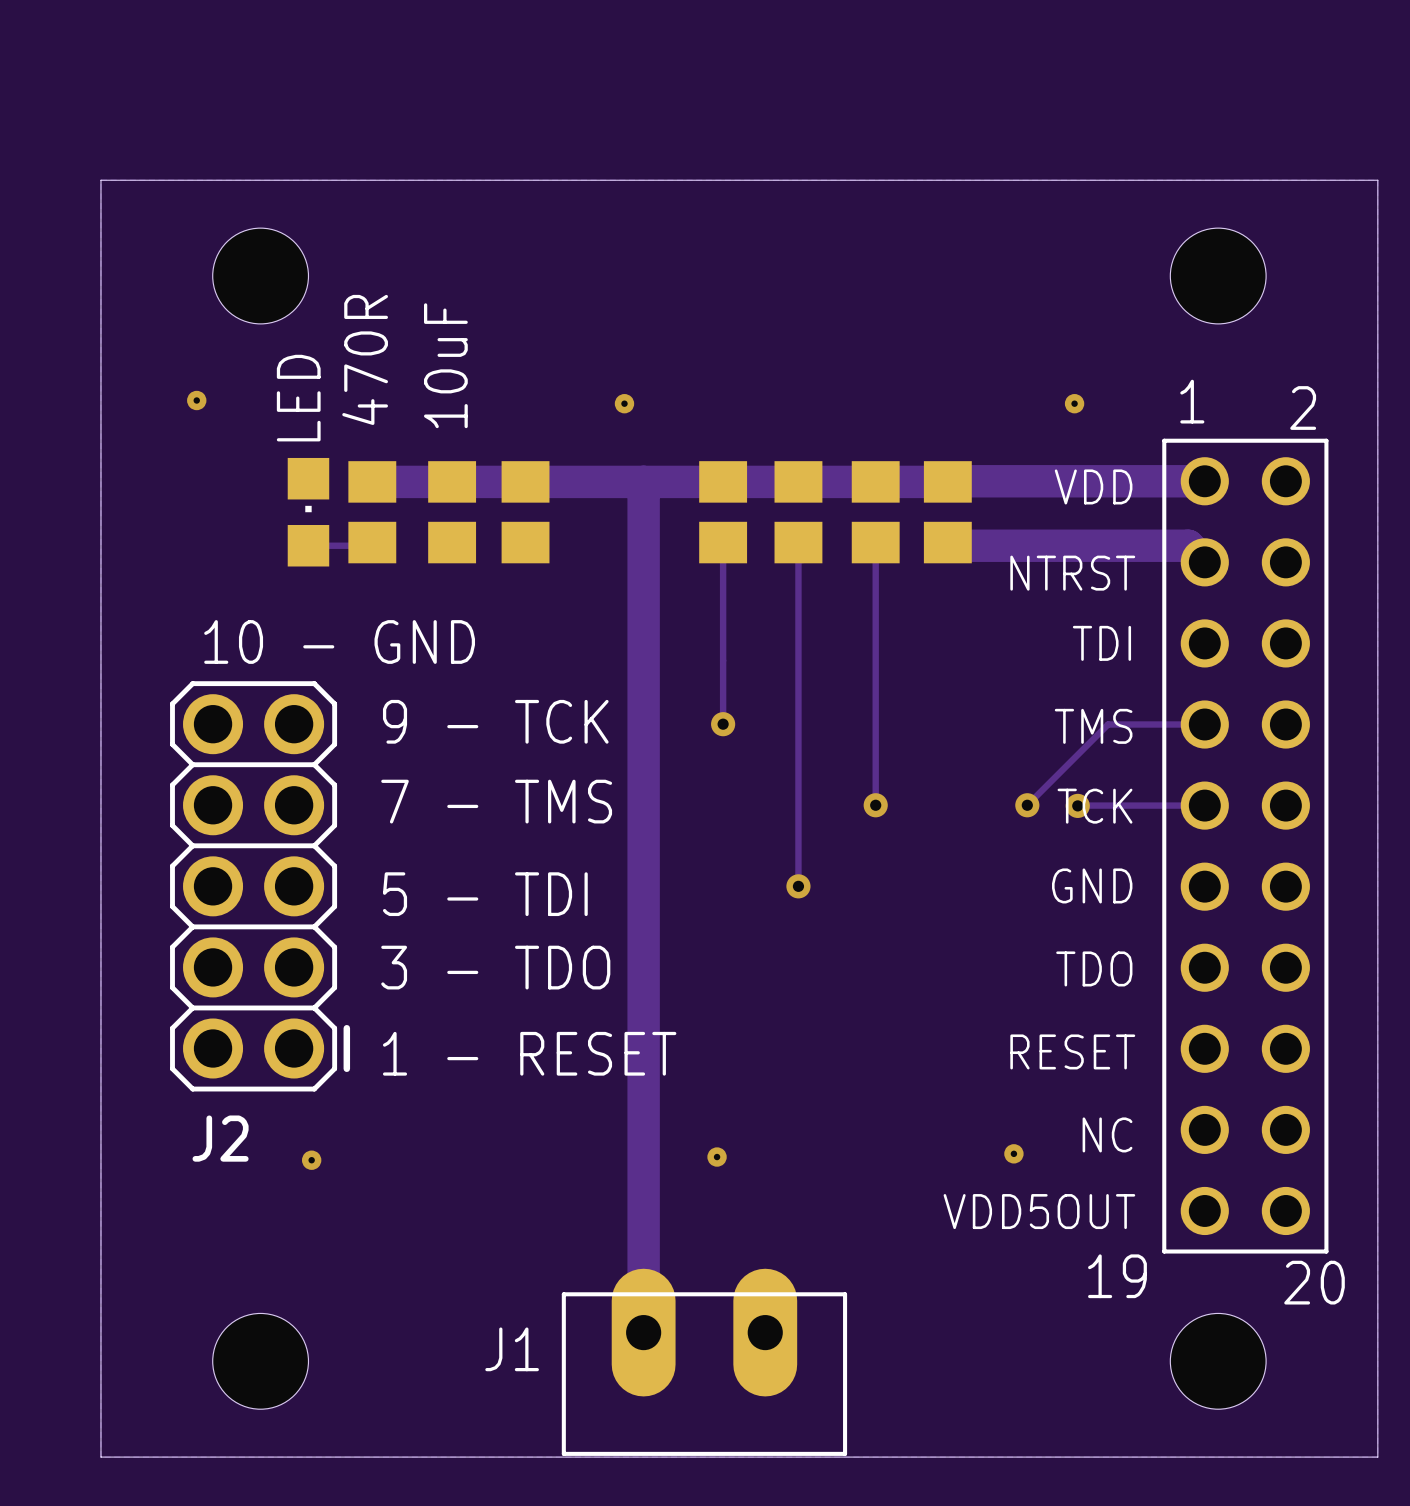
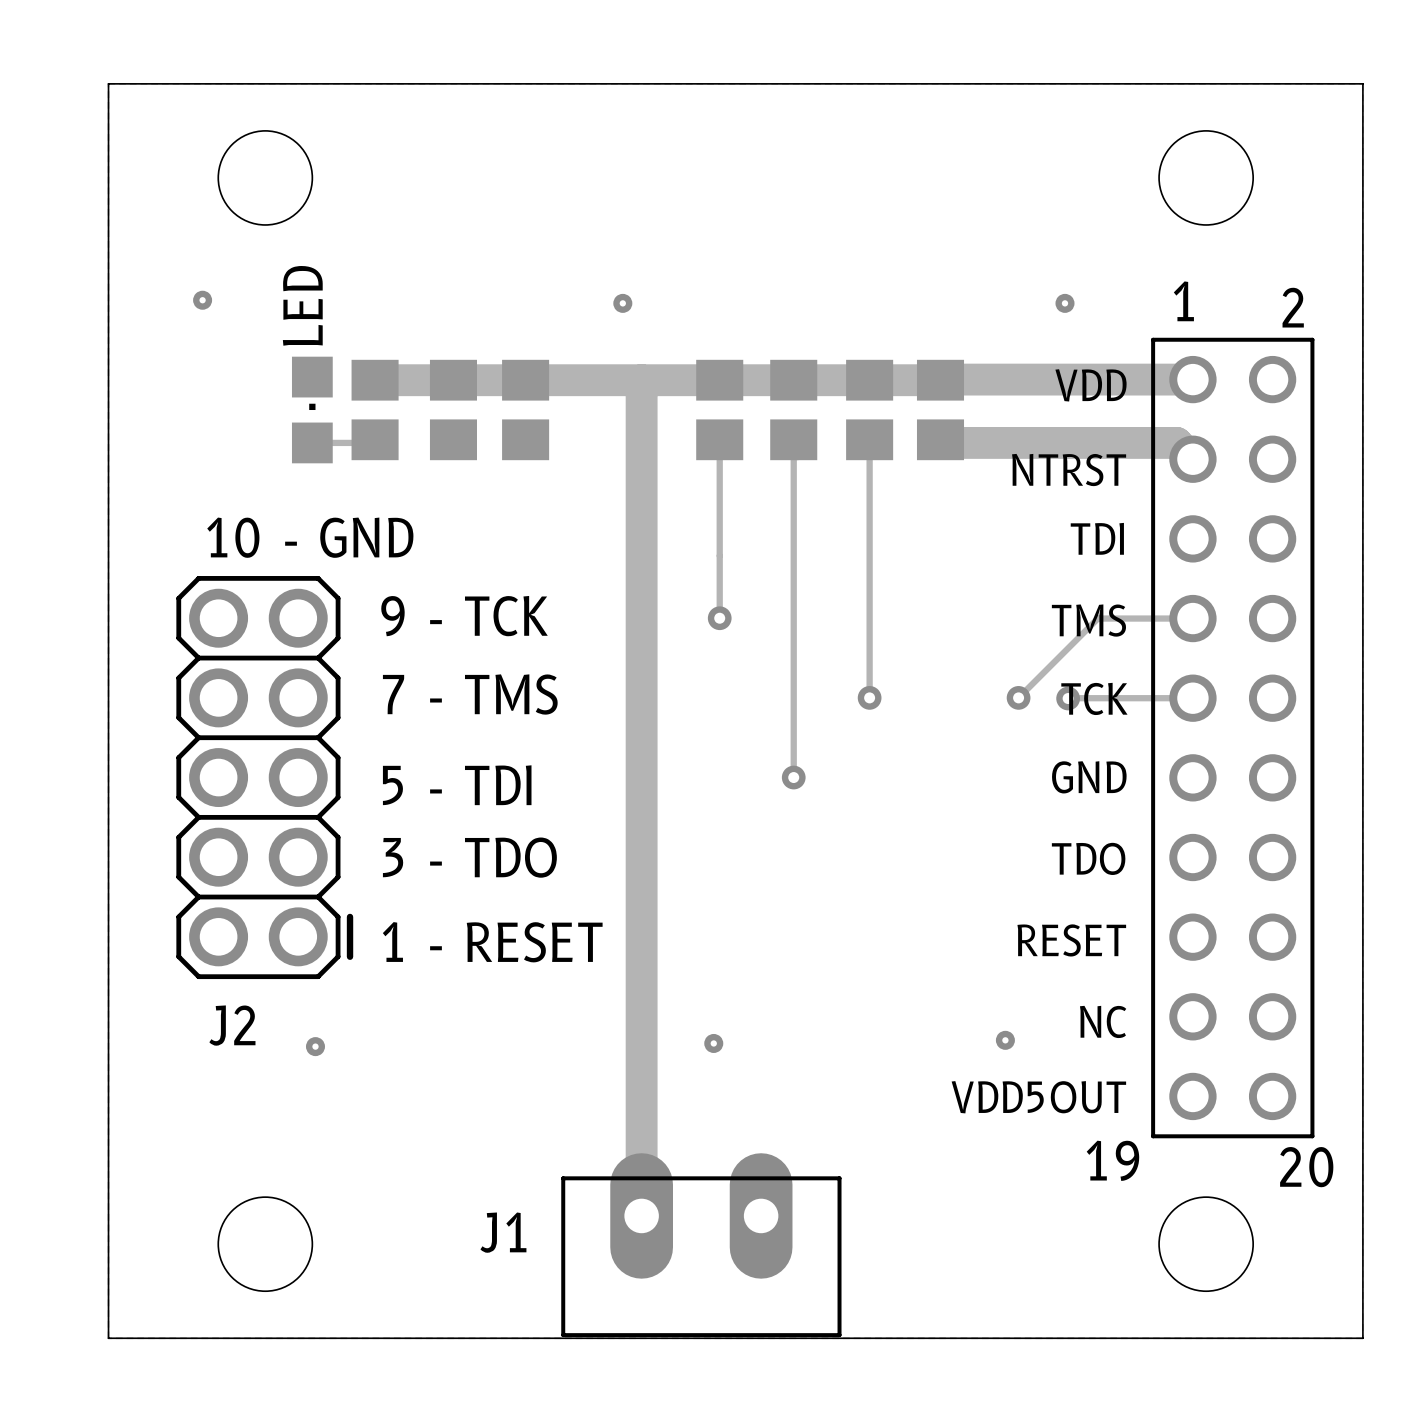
part value: 470R (365, 359) -> none
part value: 10uF (445, 365) -> none

